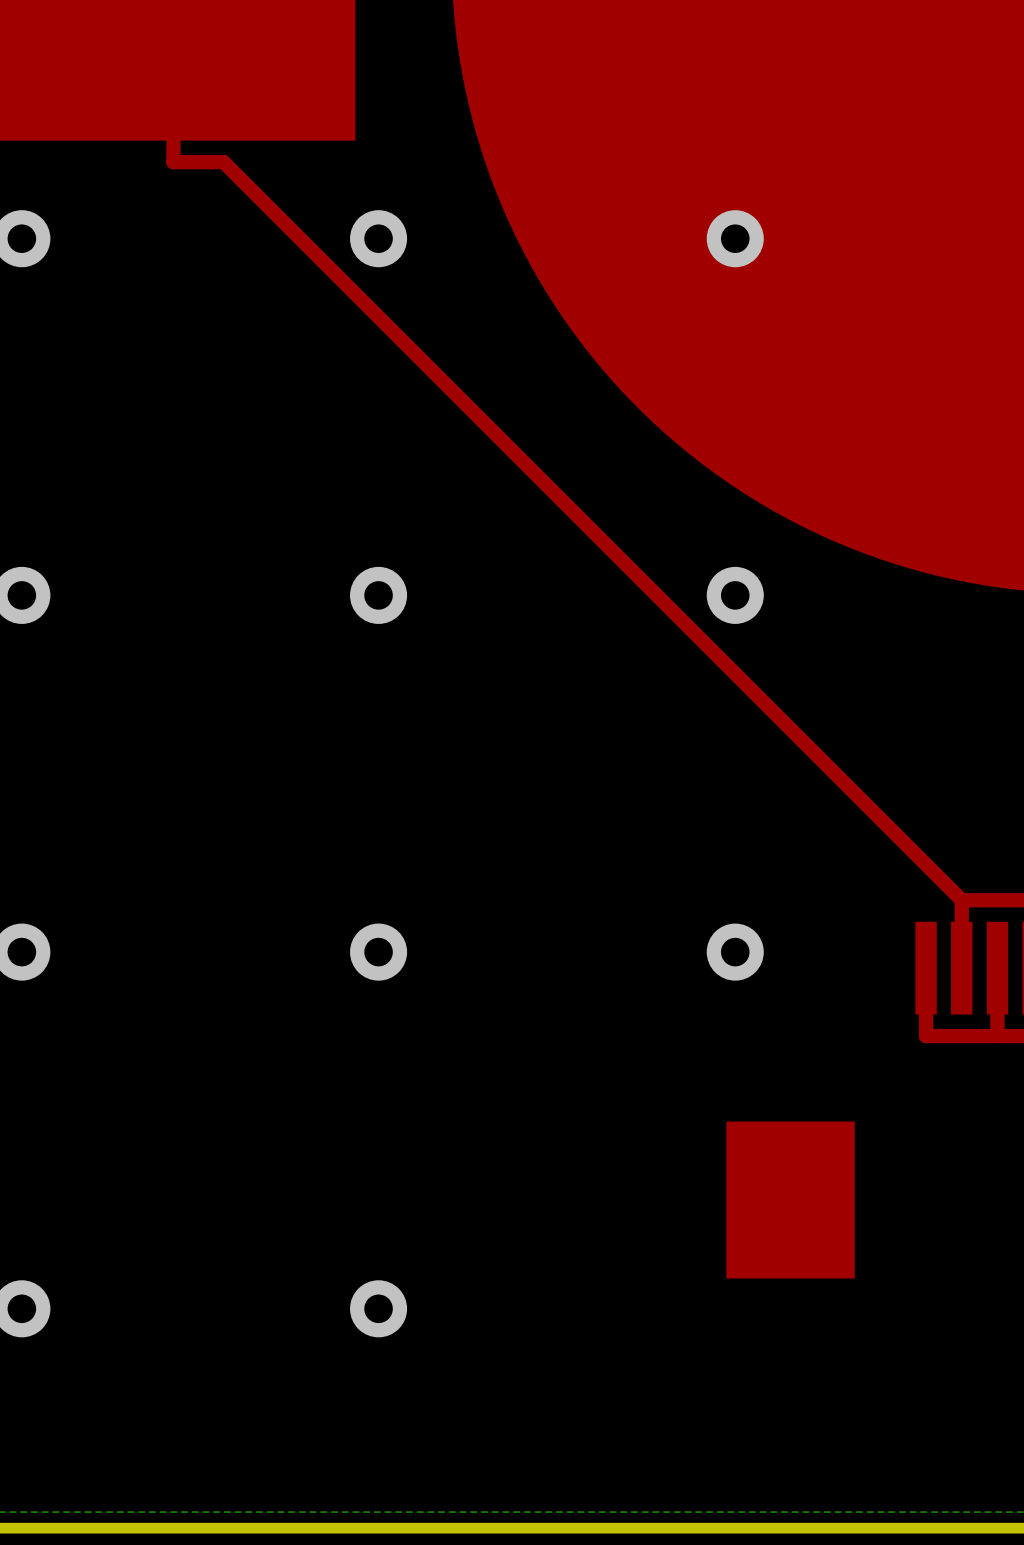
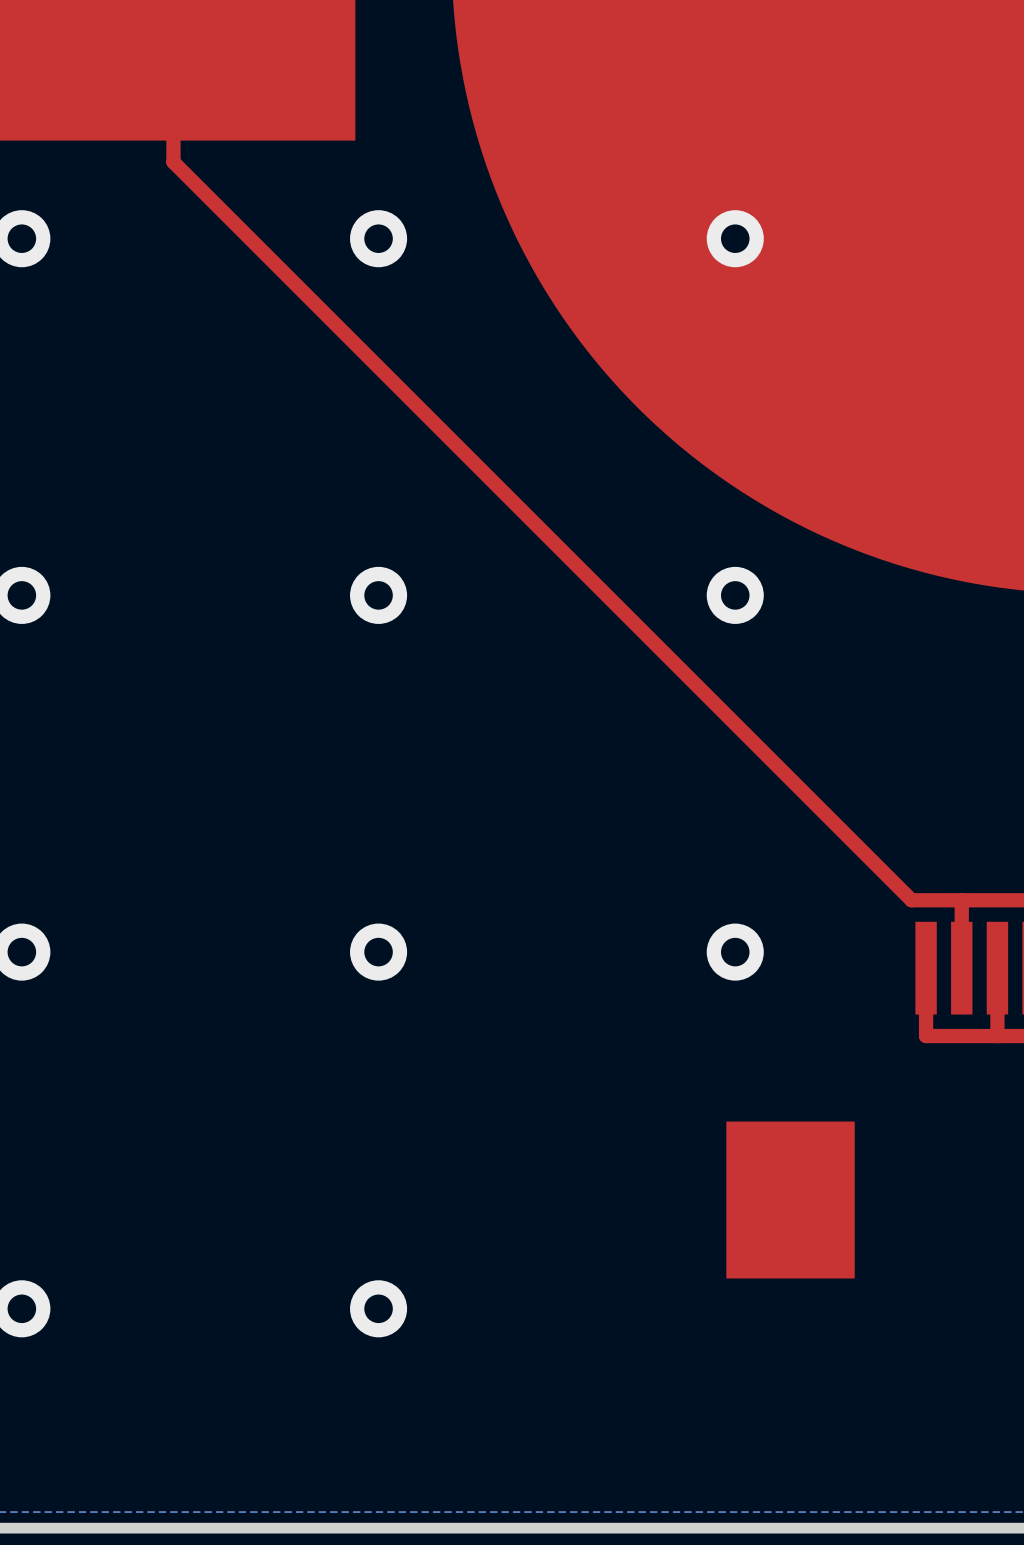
top track: (173, 162) (223, 162) (961, 900) -> (173, 162) (911, 900) (961, 900)

